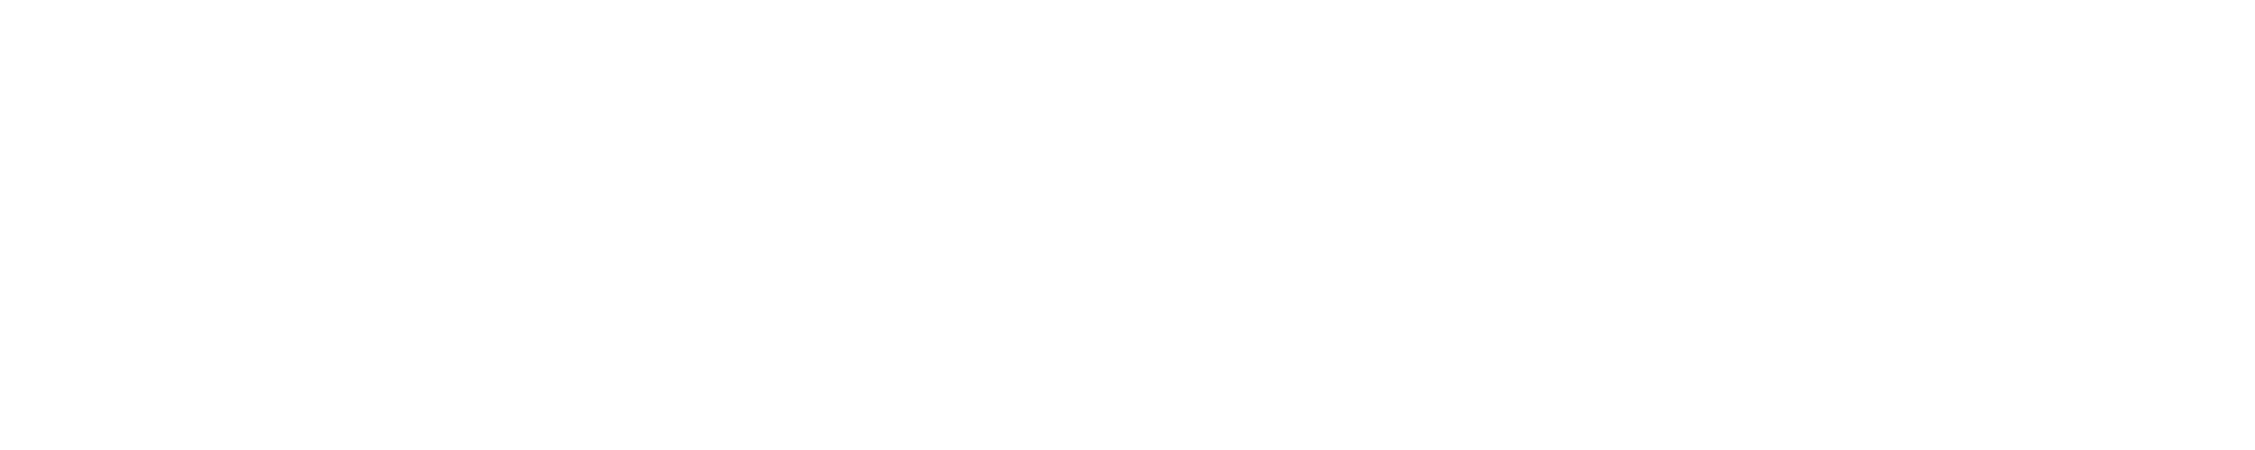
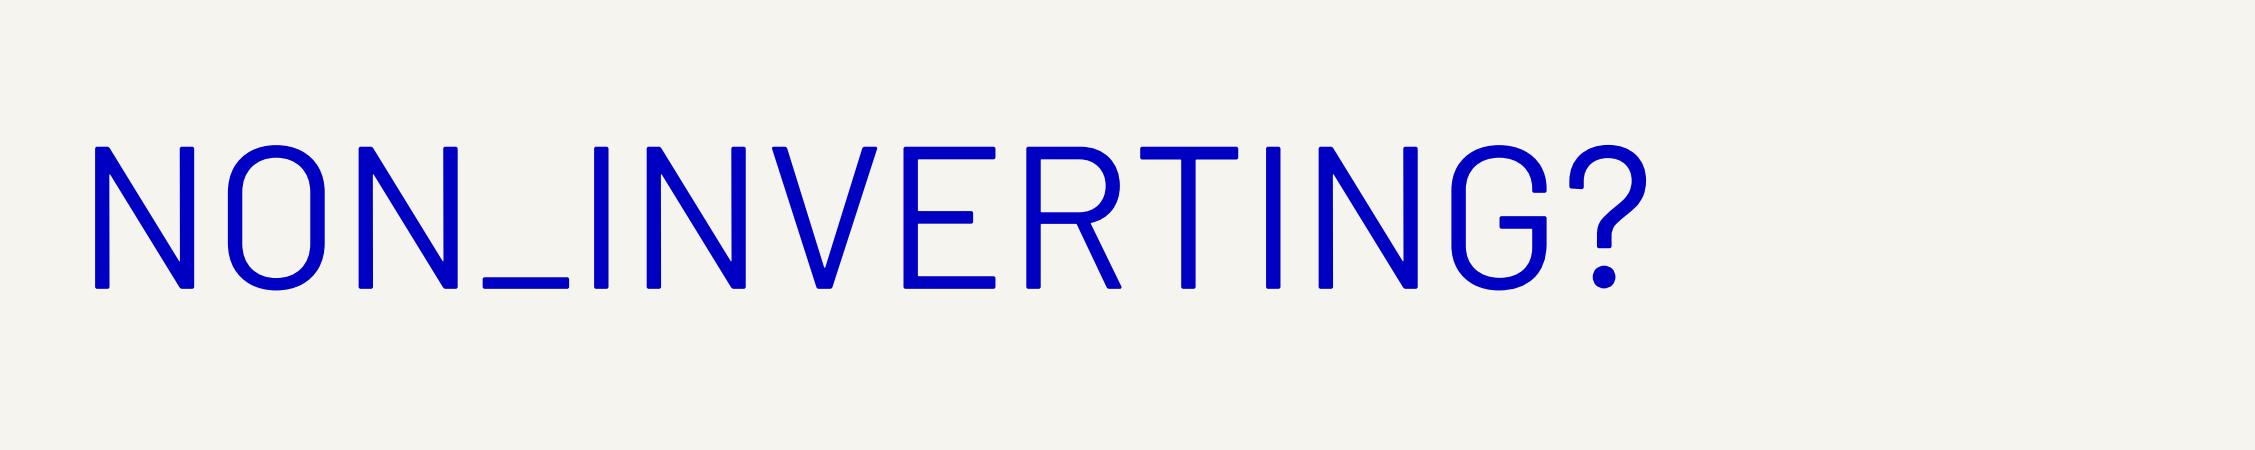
text: none -> NON_INVERTING? (870, 217)

